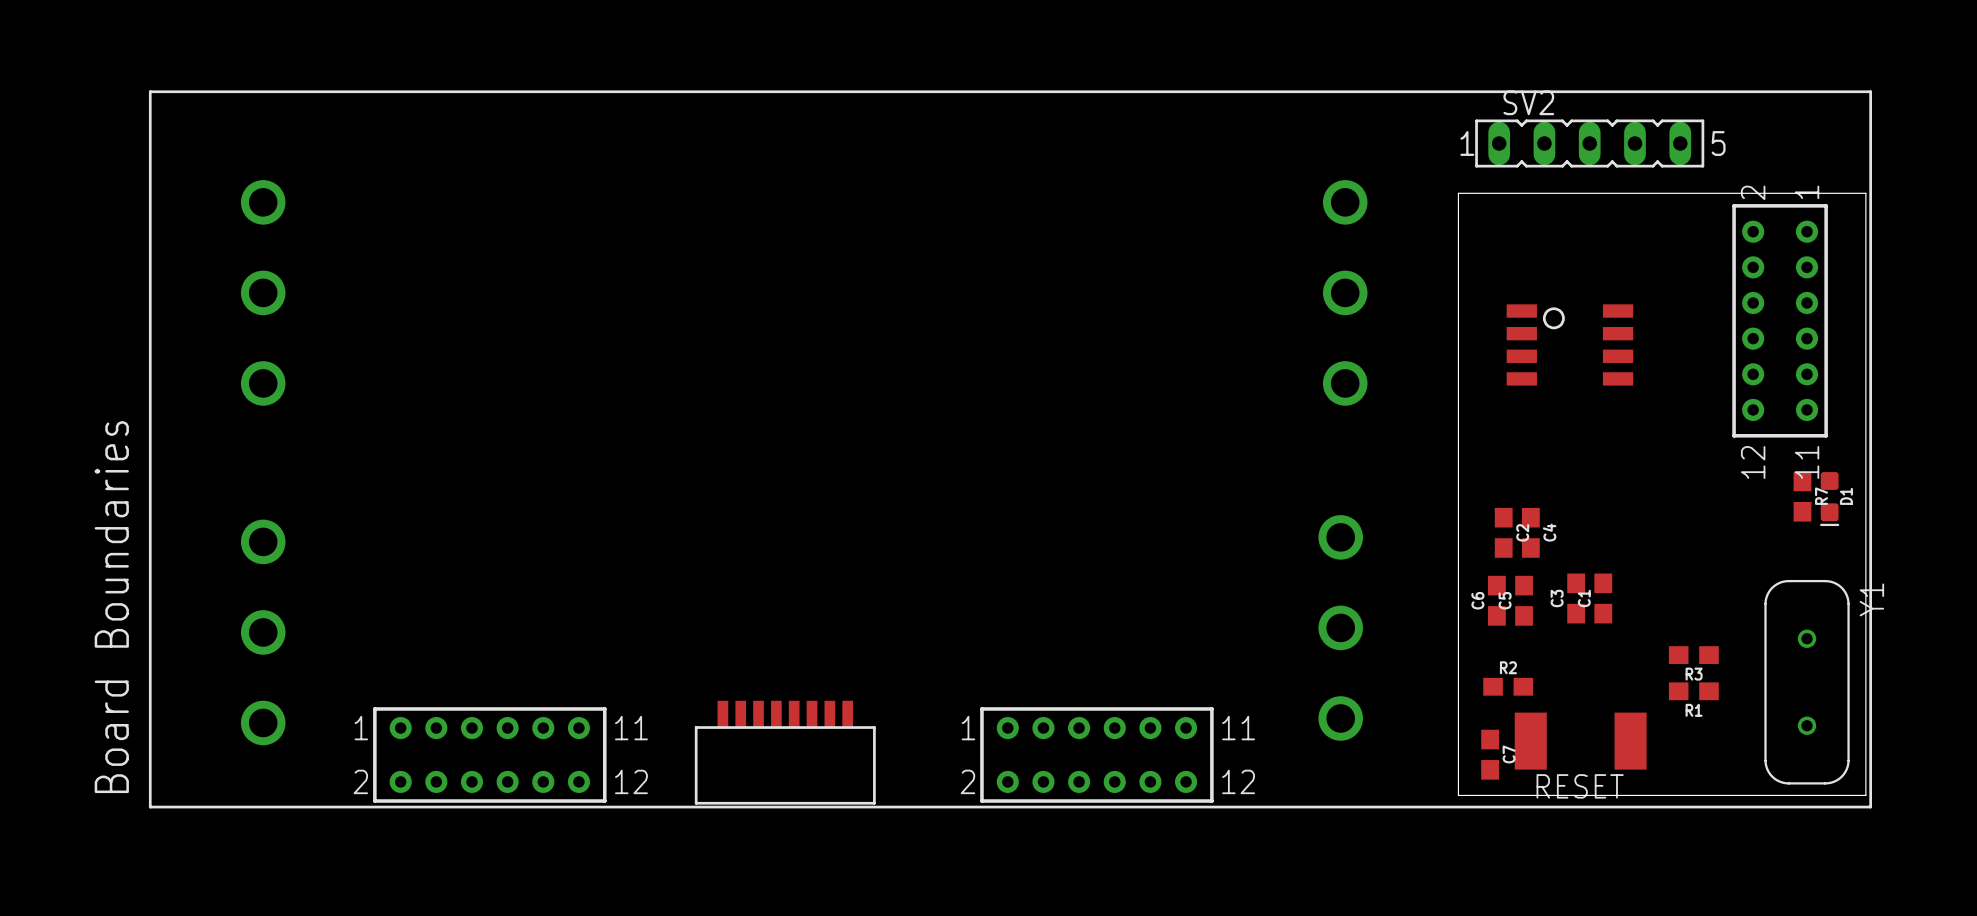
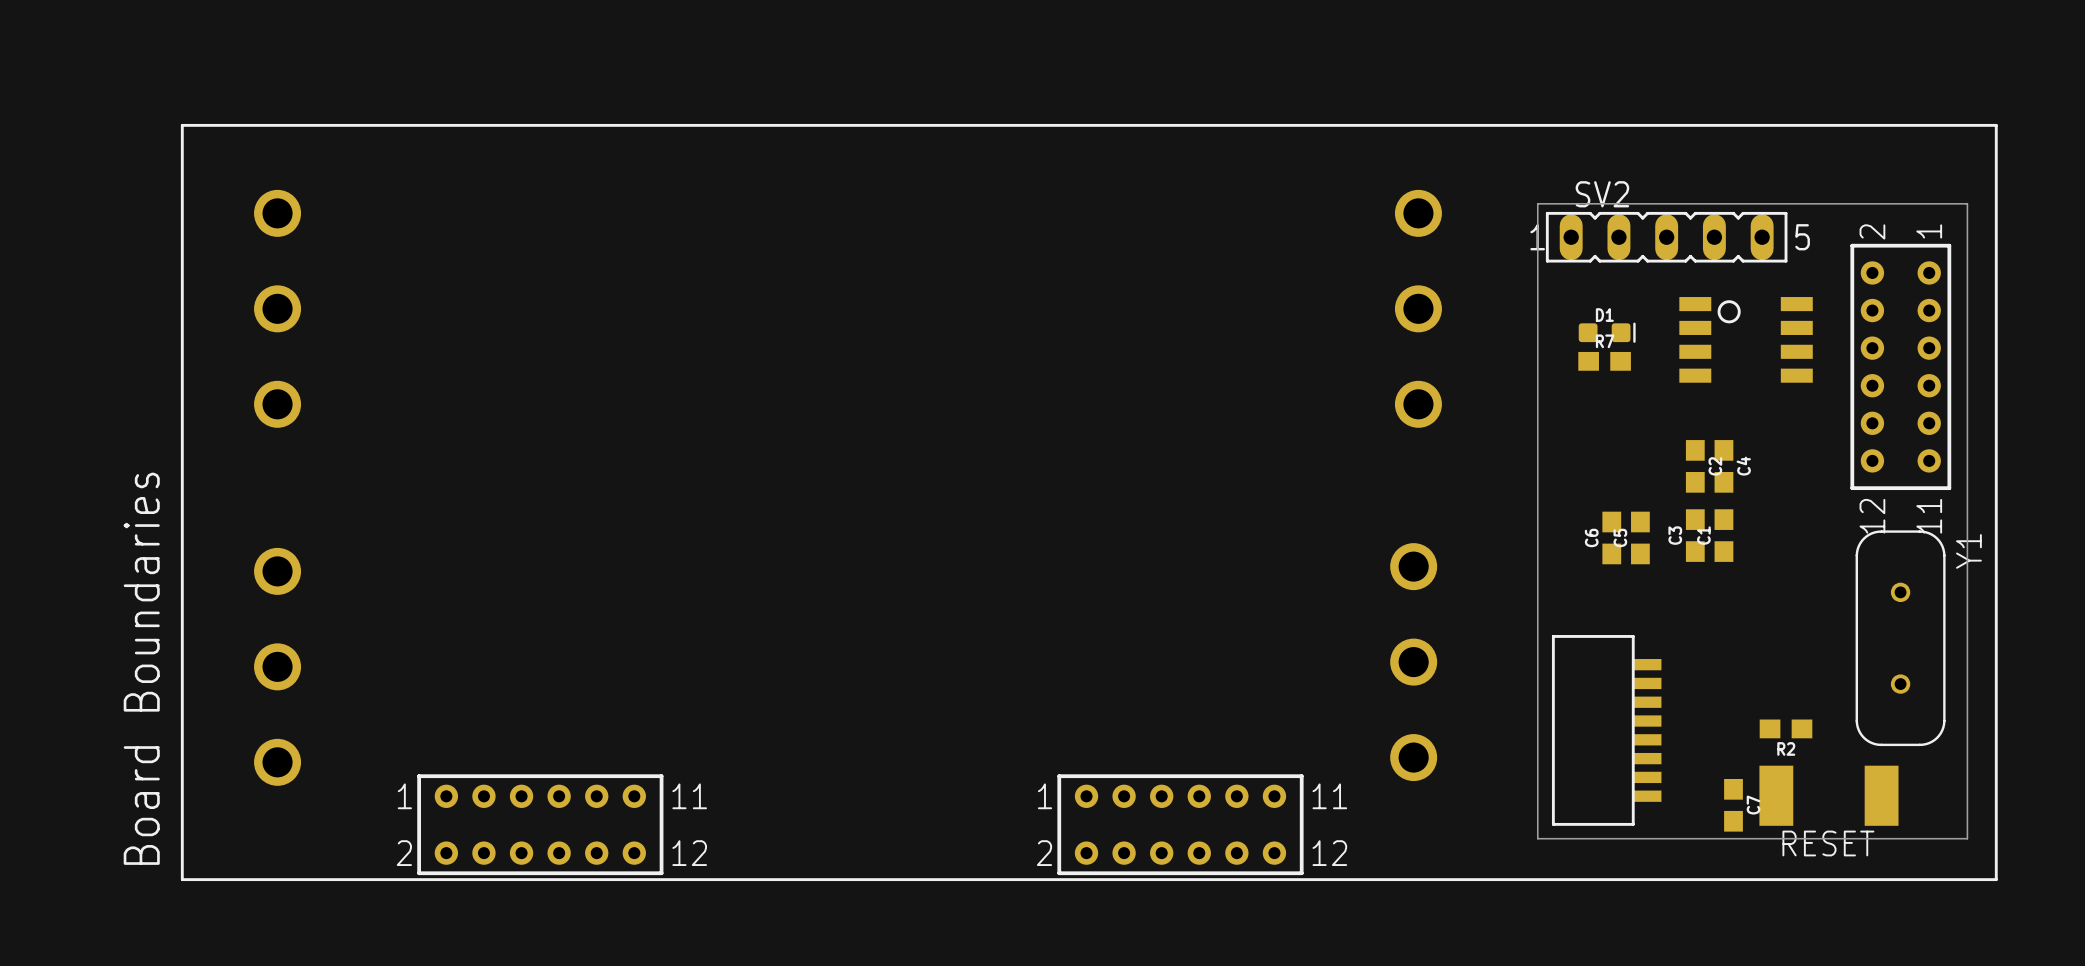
SV2 position: (1589, 143) -> (1666, 237)
part position: (1569, 344) -> (1746, 339)
part position: (1010, 449) -> (1089, 502)
R7 rotation: 0° (1802, 496) -> 90° clockwise (1604, 361)
R7 position: (1802, 496) -> (1604, 361)
D1 rotation: 0° (1829, 499) -> 90° counterclockwise (1607, 332)
D1 position: (1829, 499) -> (1607, 332)
C2 position: (1503, 532) -> (1695, 466)
C4 position: (1530, 532) -> (1723, 466)
C3 position: (1576, 598) -> (1695, 535)
C1 position: (1603, 598) -> (1723, 535)
C6 position: (1496, 600) -> (1611, 537)
C5 position: (1524, 600) -> (1640, 537)
R3: (1693, 655) -> none
Y1 position: (1807, 682) -> (1900, 638)
R2: (1508, 686) -> none
part: none -> (1606, 730)
R1 name: R1 (1694, 710) -> R2 (1786, 748)
RESET position: (1580, 741) -> (1828, 795)
part: (785, 752) -> none
C7 position: (1490, 754) -> (1733, 805)

